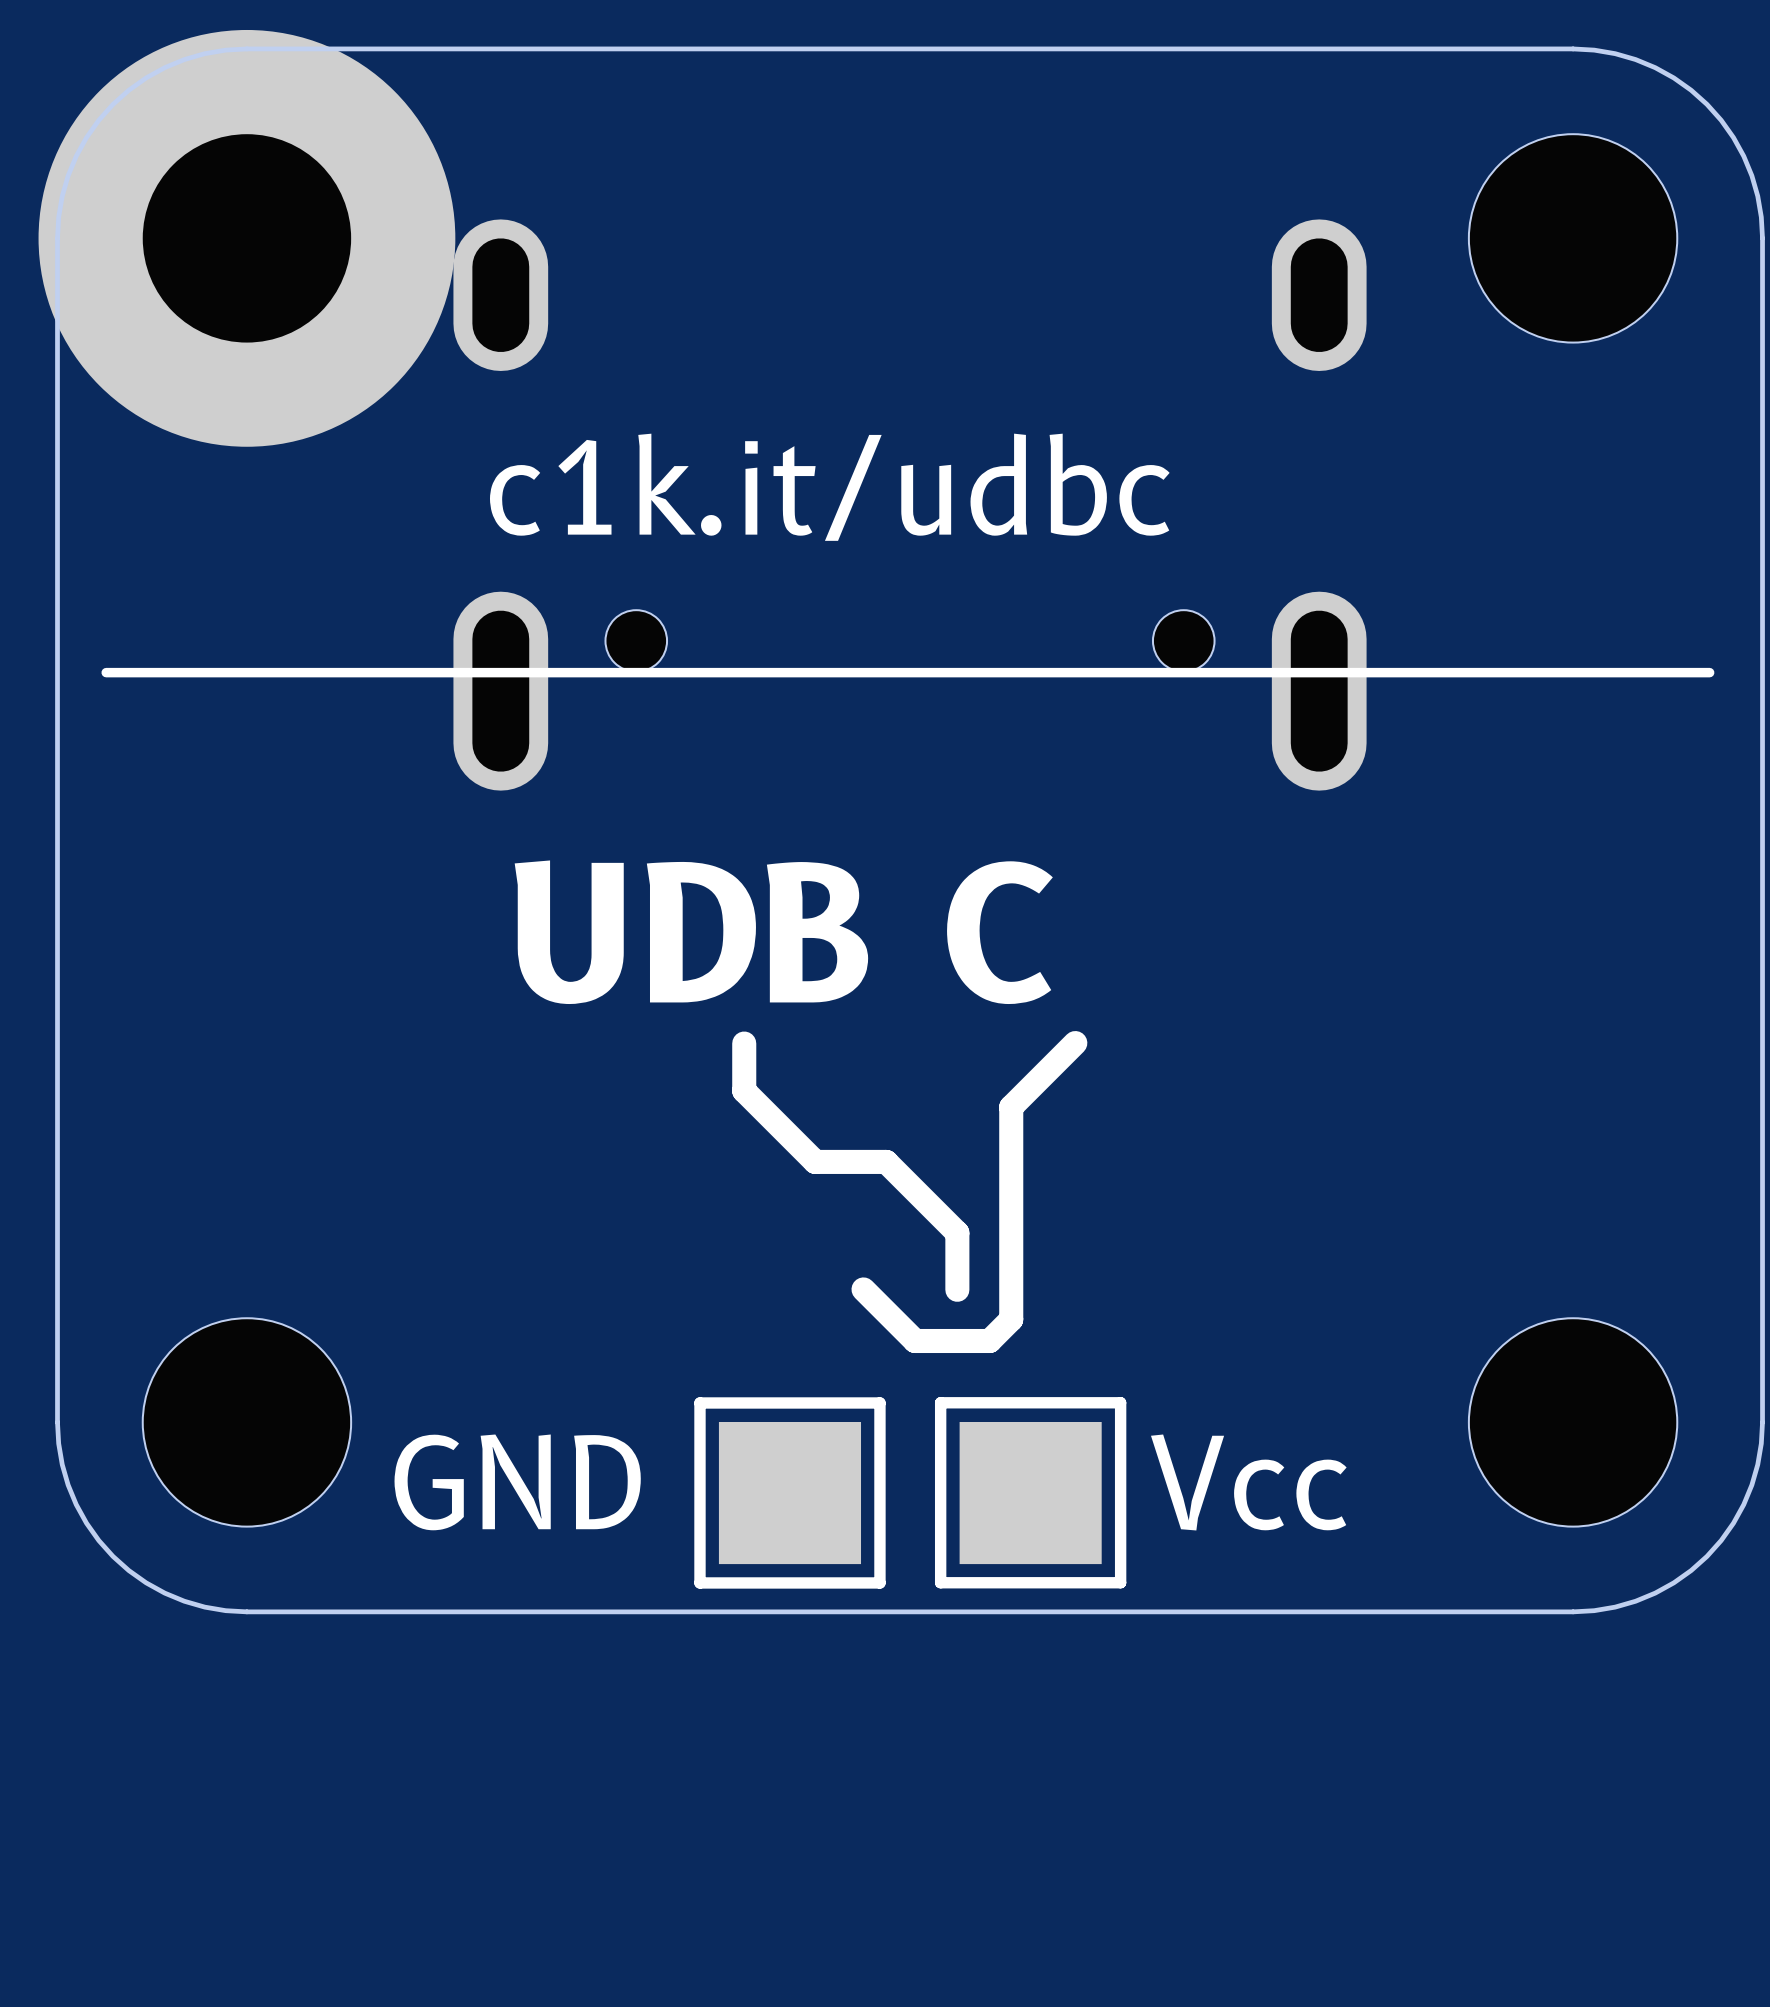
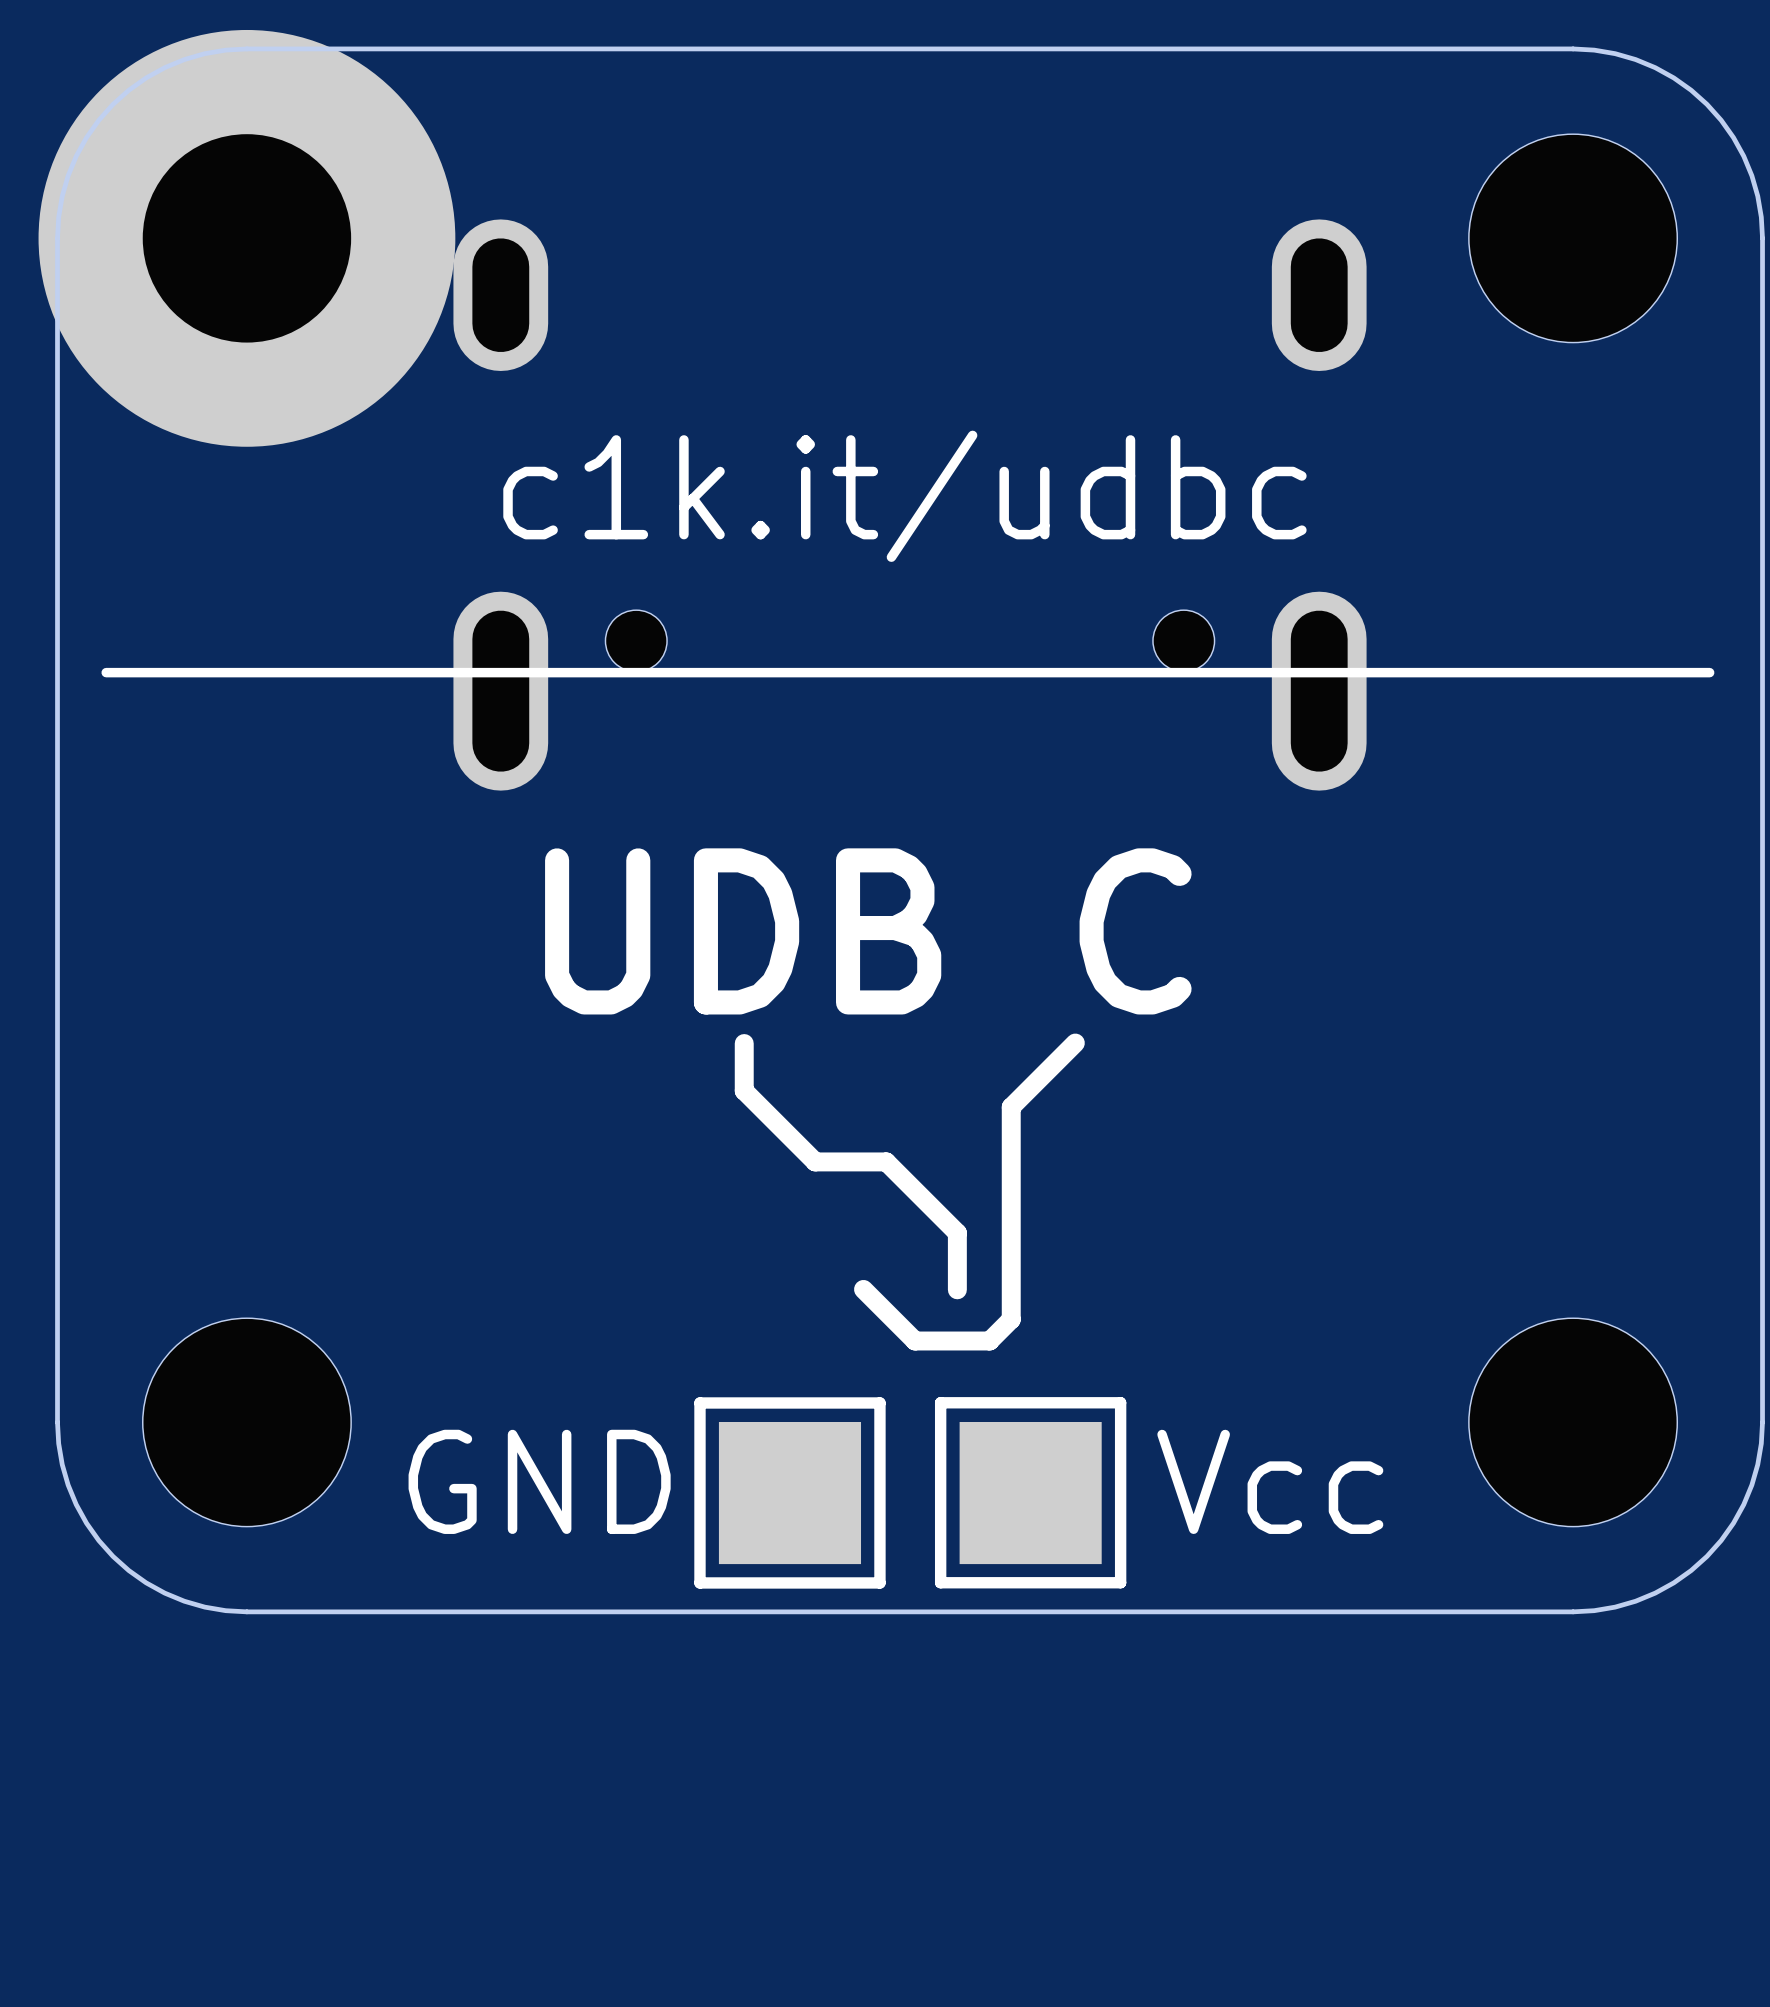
line width: thick (744, 1043) (744, 1090) (815, 1161) (886, 1161) (957, 1232) (957, 1289) -> thin (744, 1043) (744, 1090) (815, 1161) (886, 1161) (957, 1232) (957, 1289)
line width: thick (1075, 1043) (1011, 1107) (1011, 1319) (989, 1340) (915, 1340) (863, 1289) -> thin (1075, 1043) (1011, 1107) (1011, 1319) (989, 1340) (915, 1340) (863, 1289)

